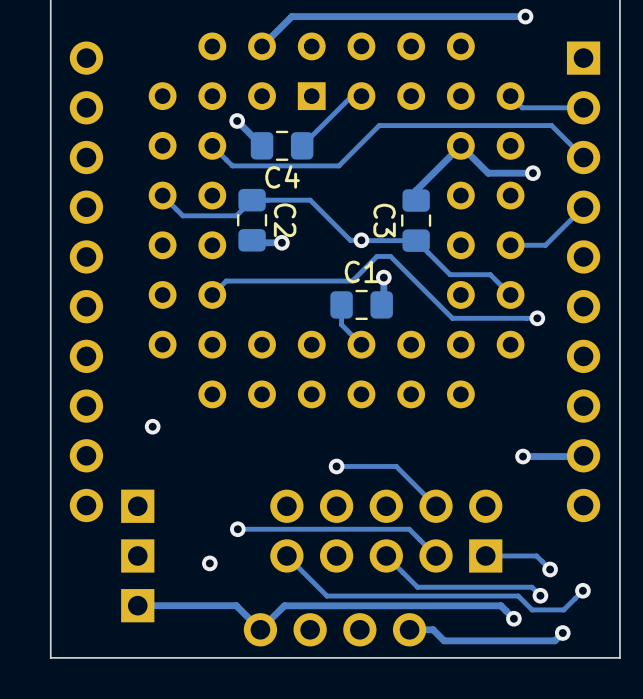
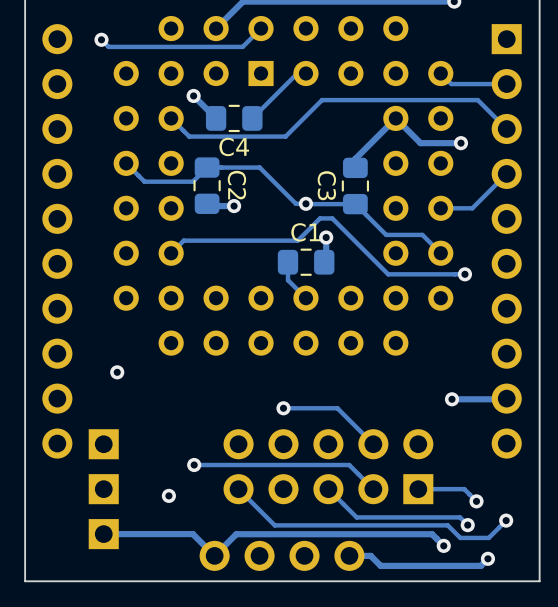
track: none -> (261, 28) (242, 46) (108, 46) (101, 39)
via: none -> (101, 39)

